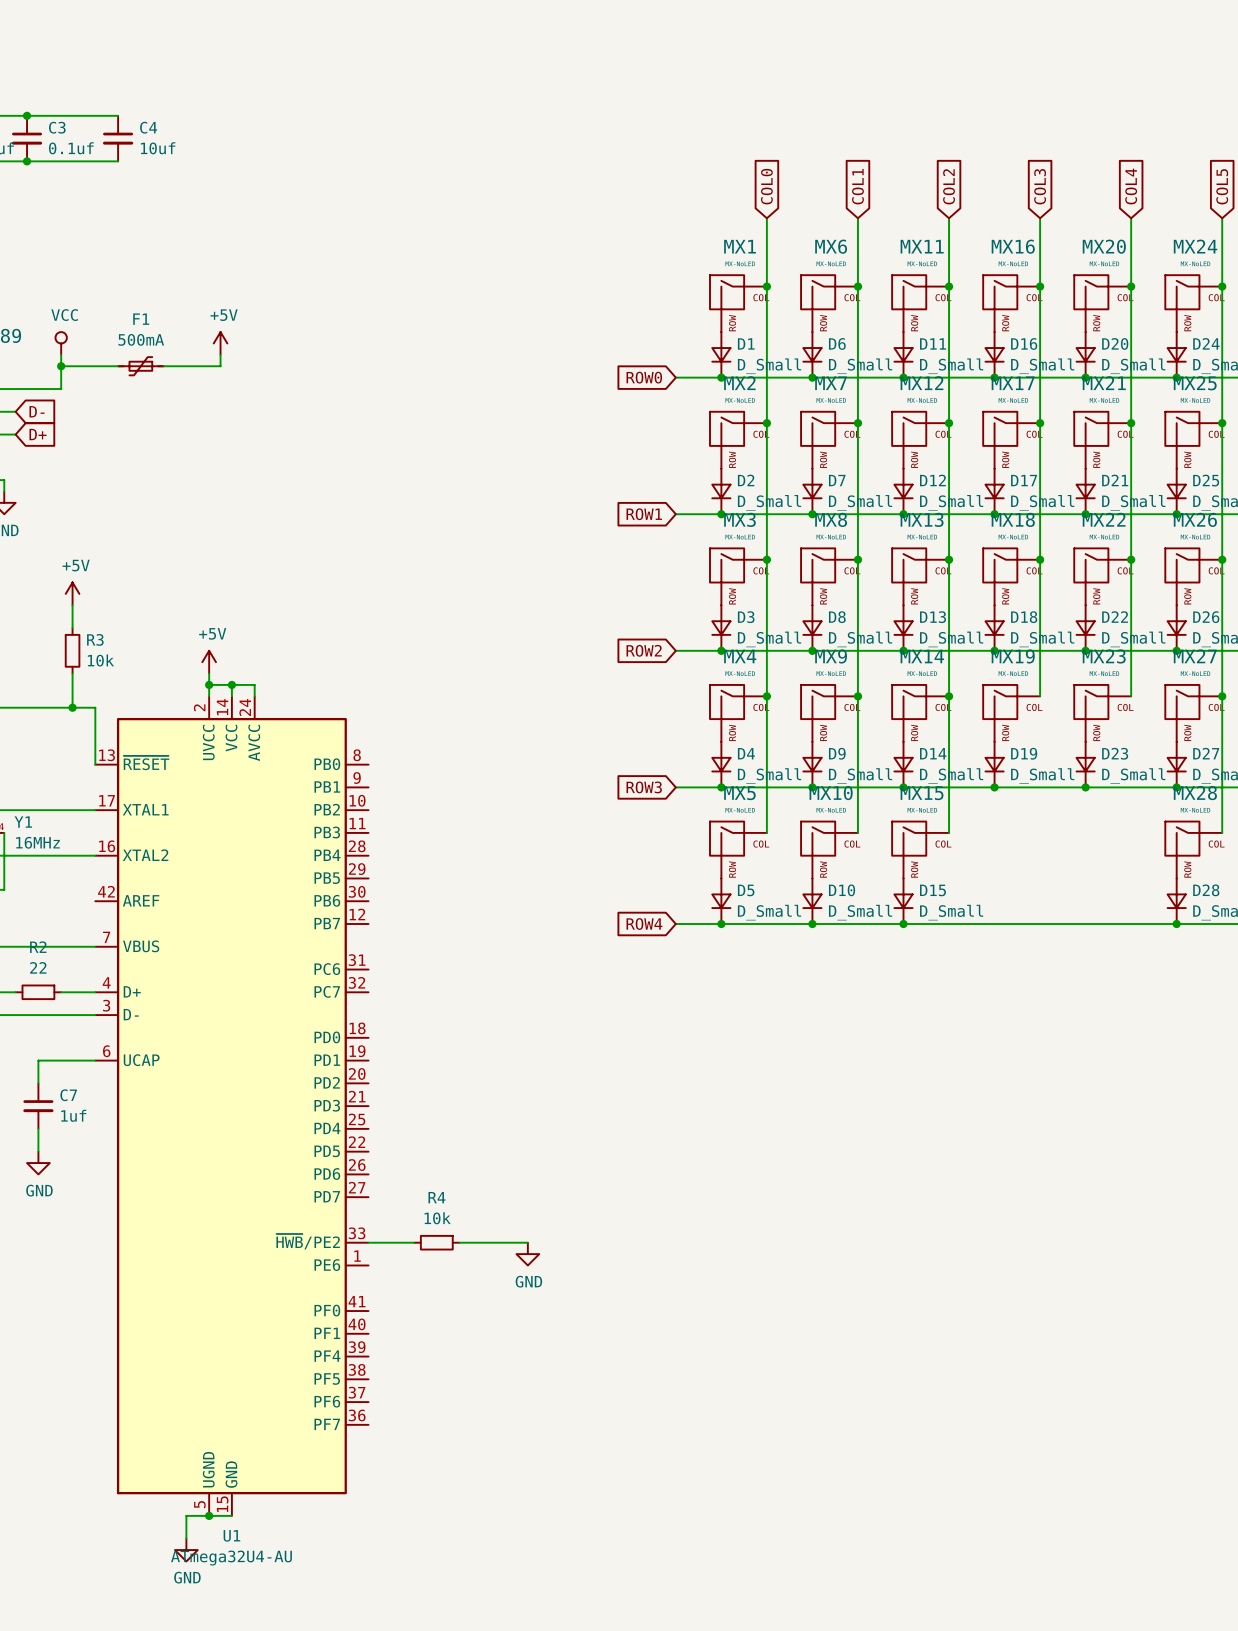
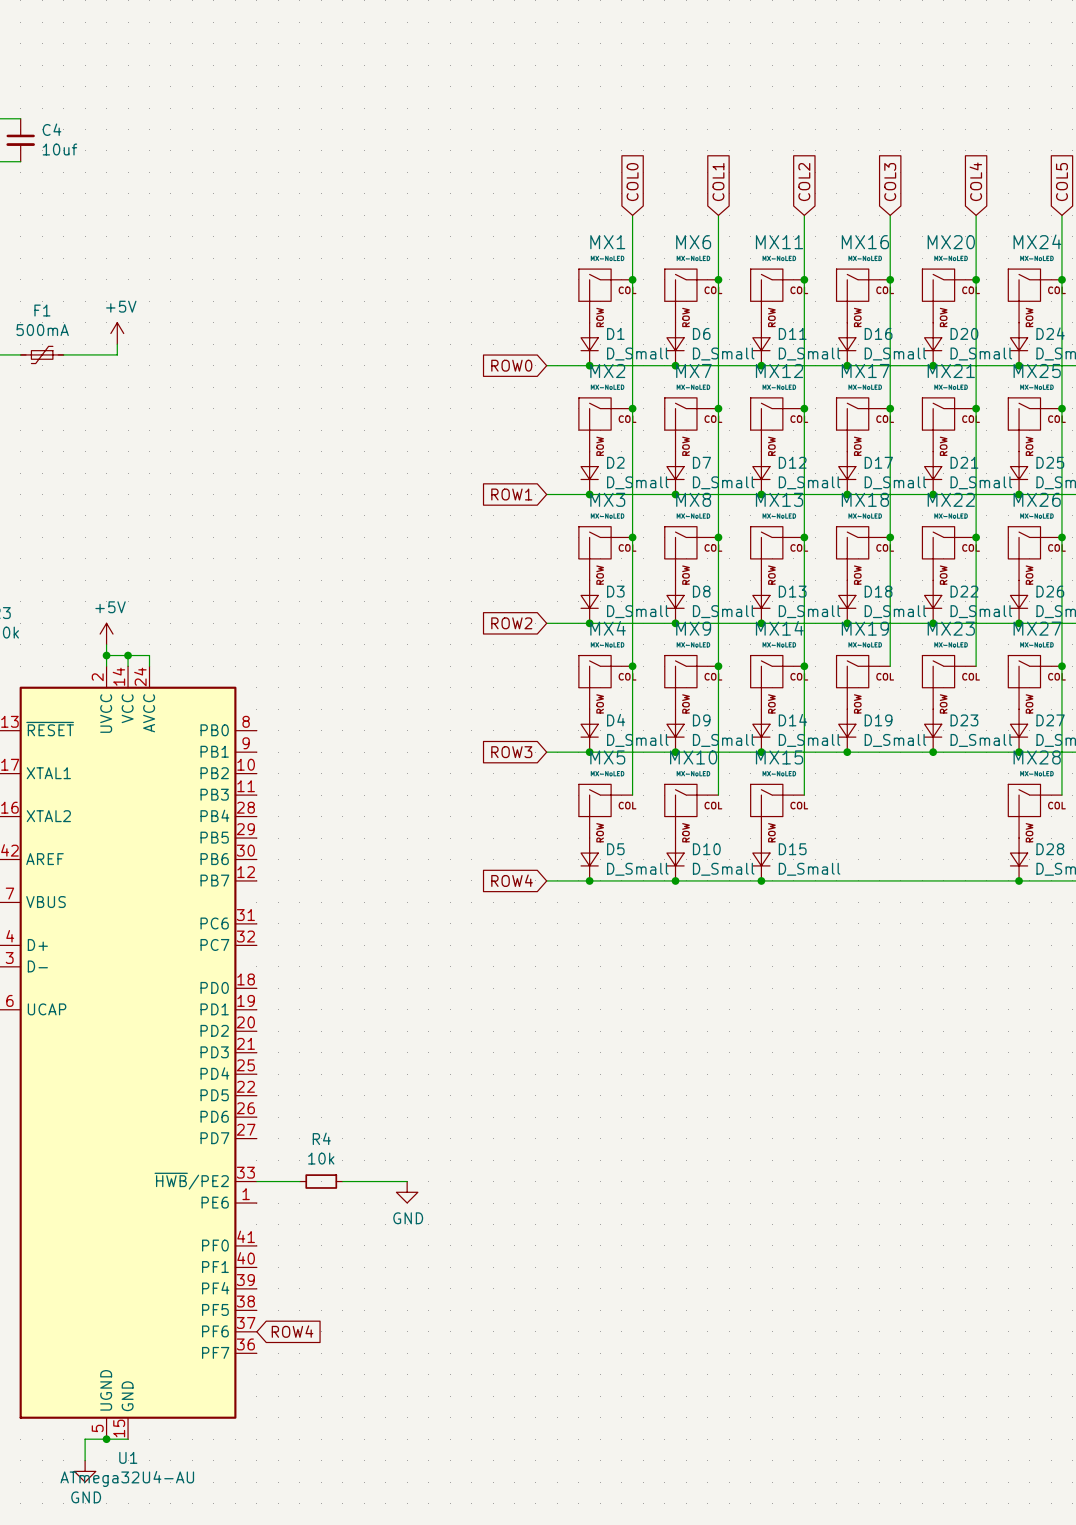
global label: none -> ROW4 (292, 1331)

